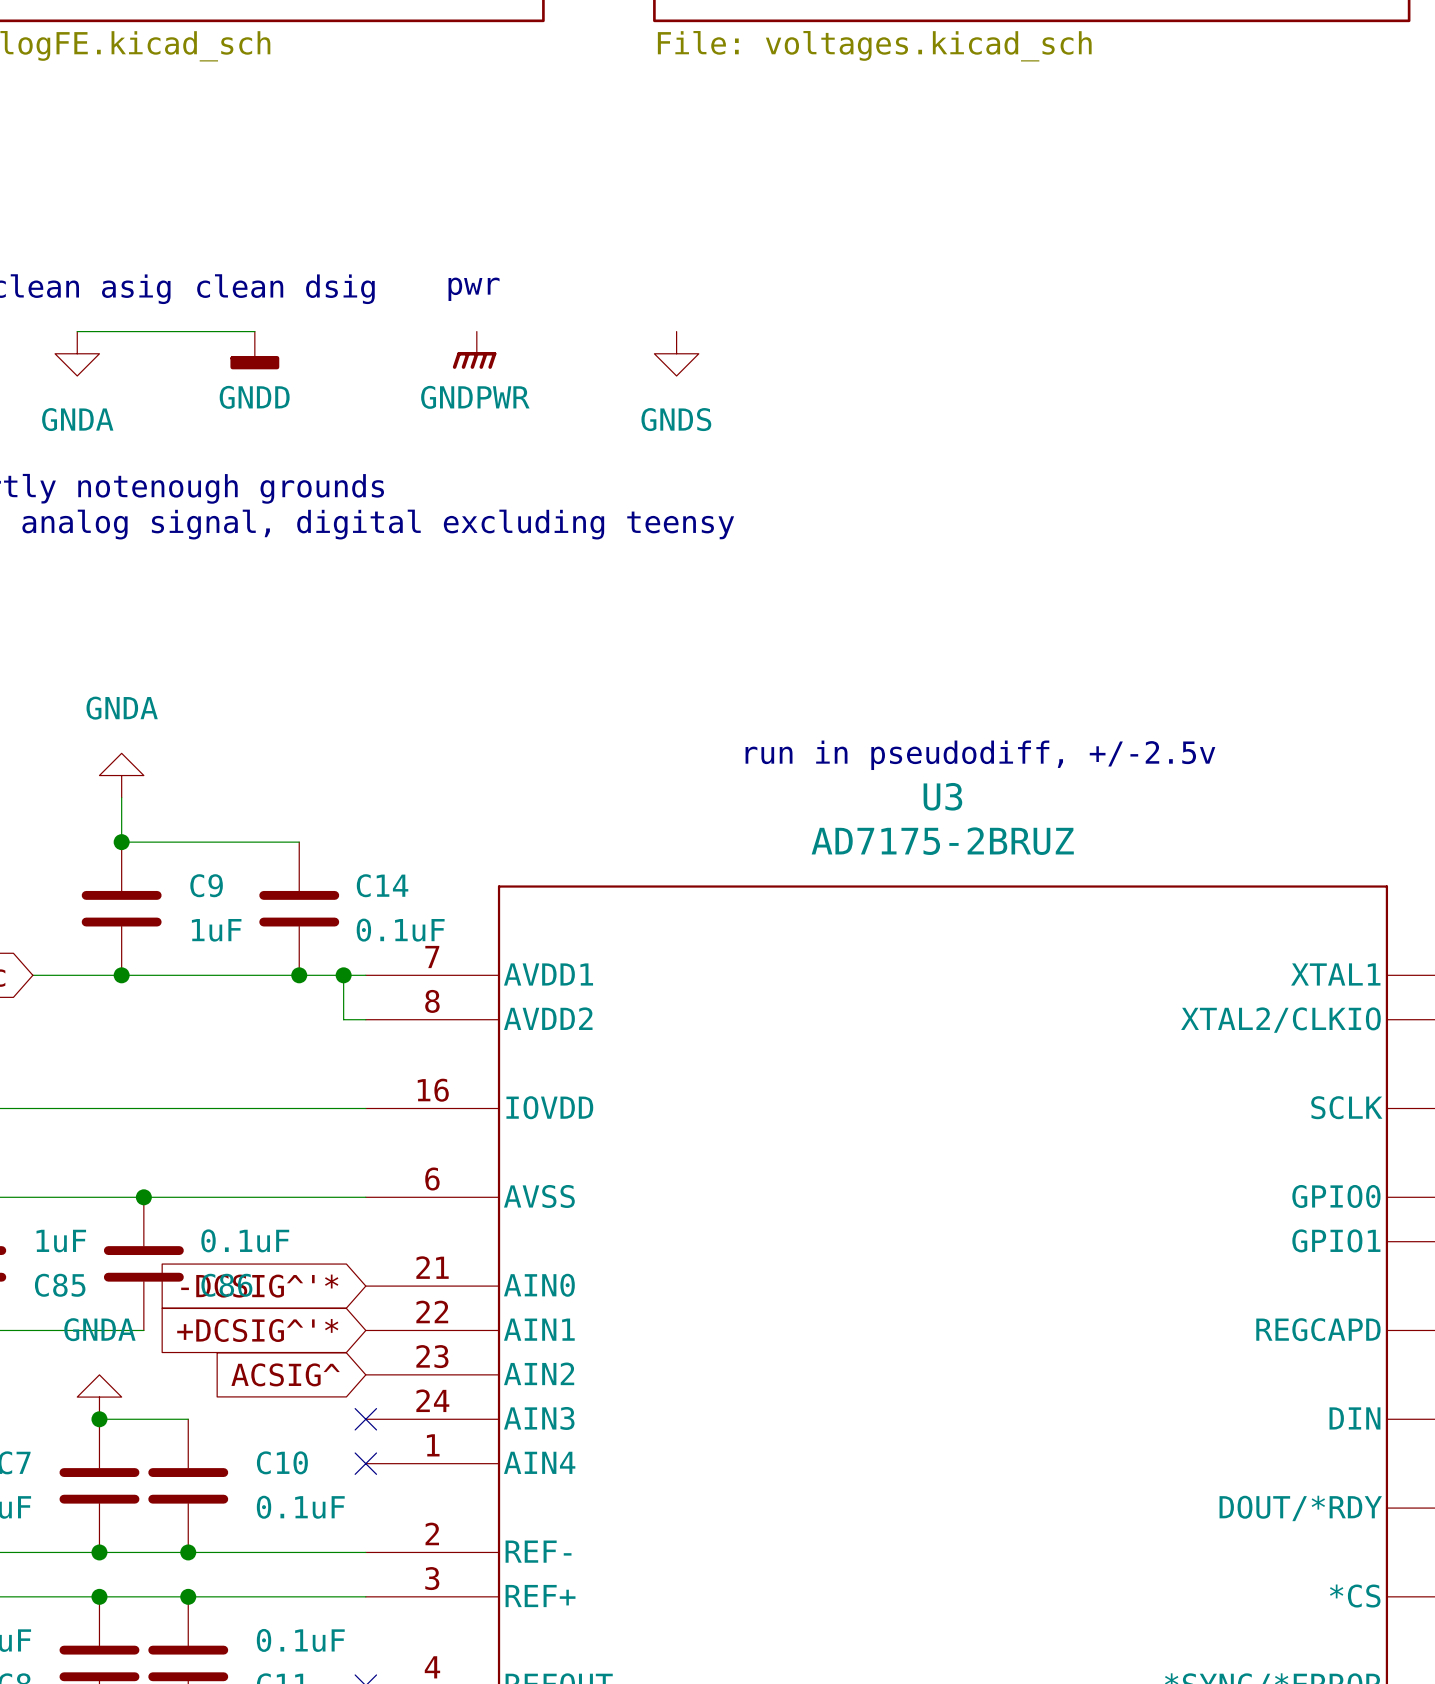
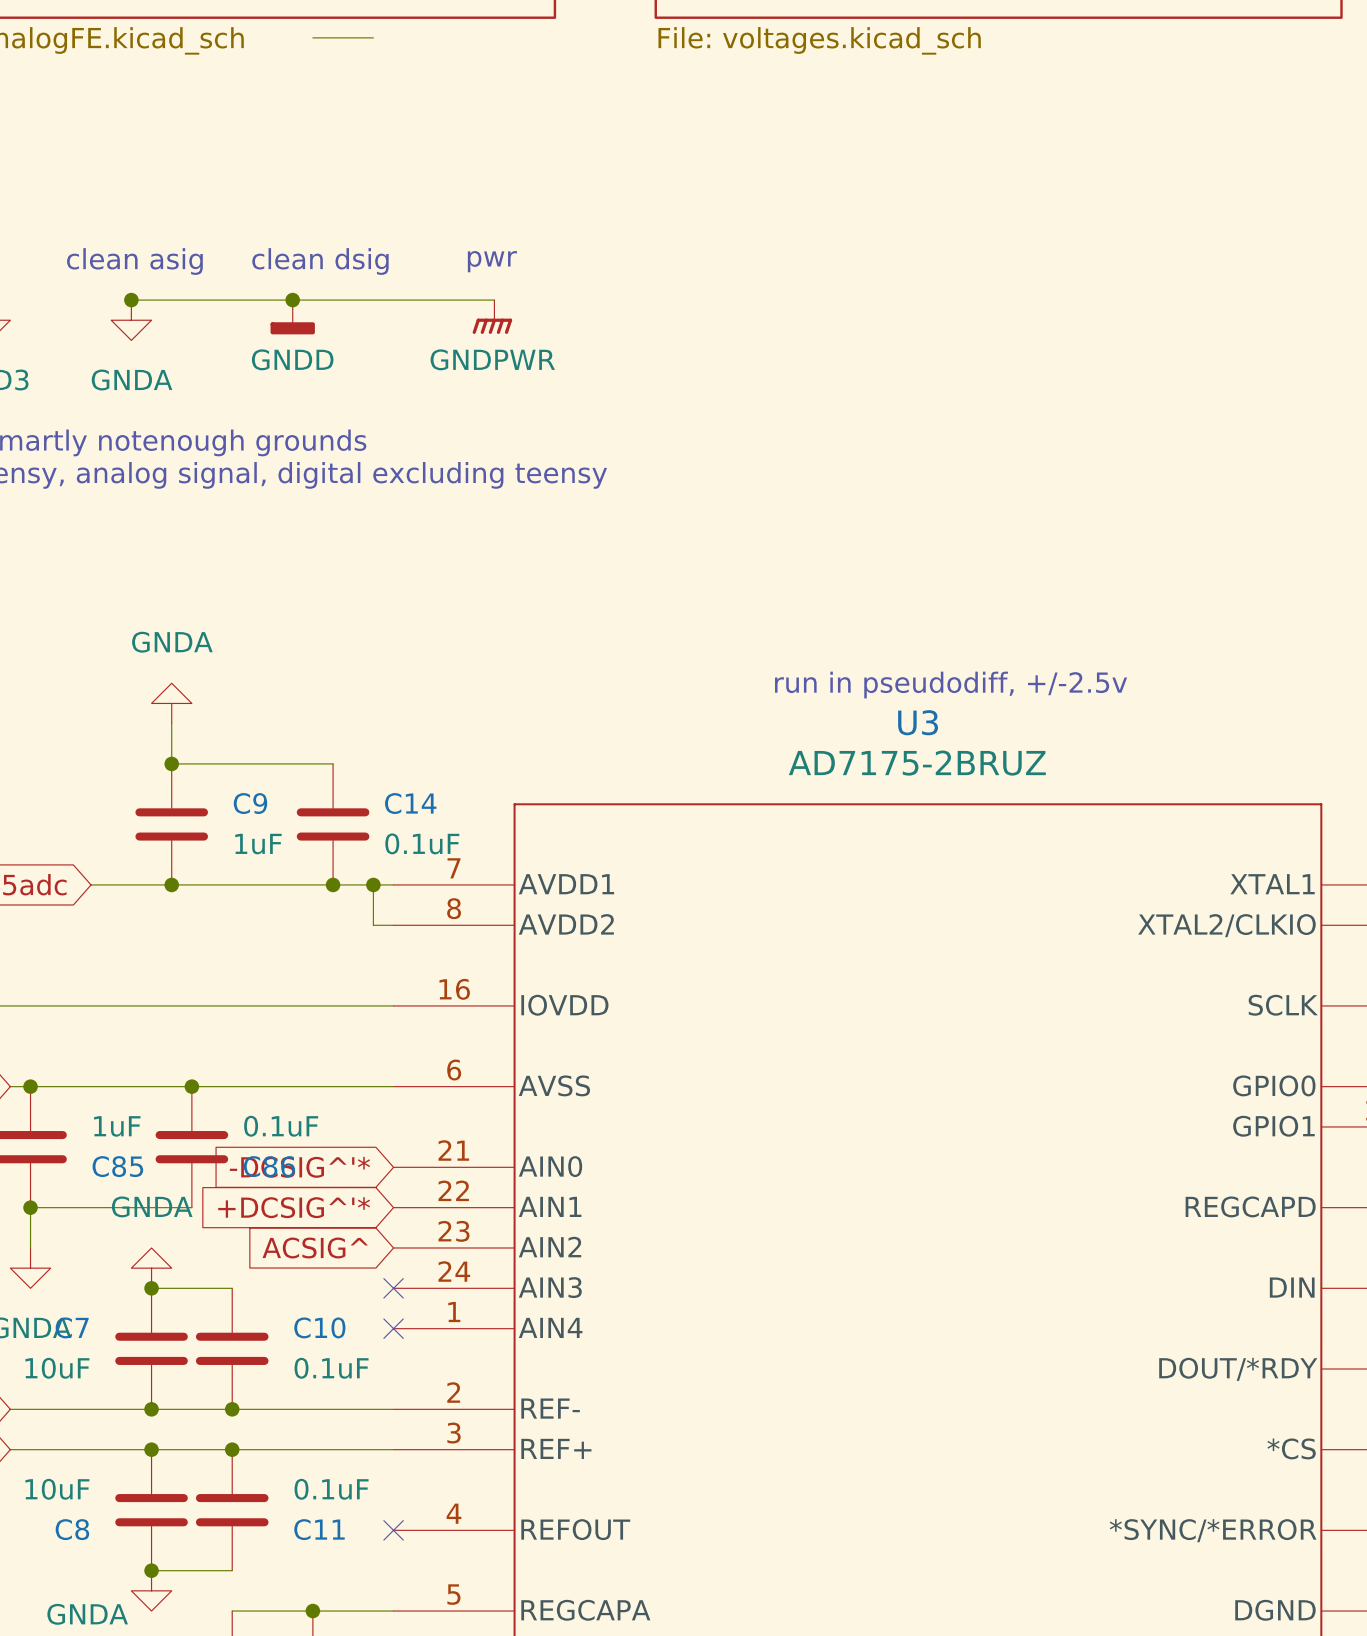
wire: none -> (312, 37) (373, 37)
junction: none -> (131, 300)
wire: none -> (292, 300) (494, 300)
junction: none -> (292, 300)
power symbol: GNDS (676, 353) -> none

